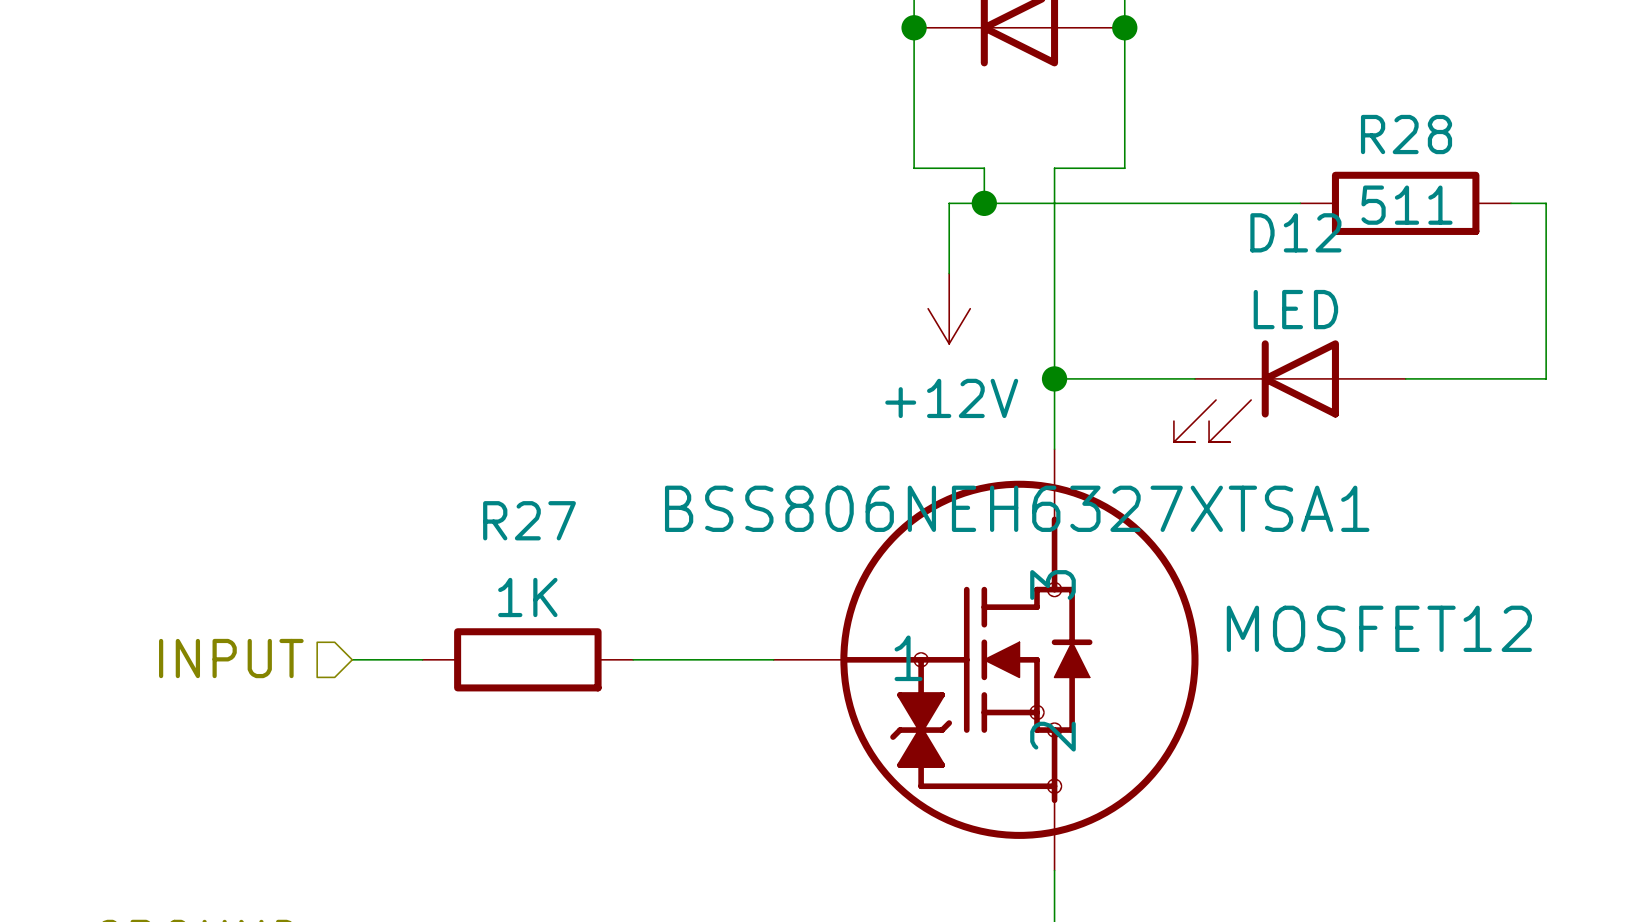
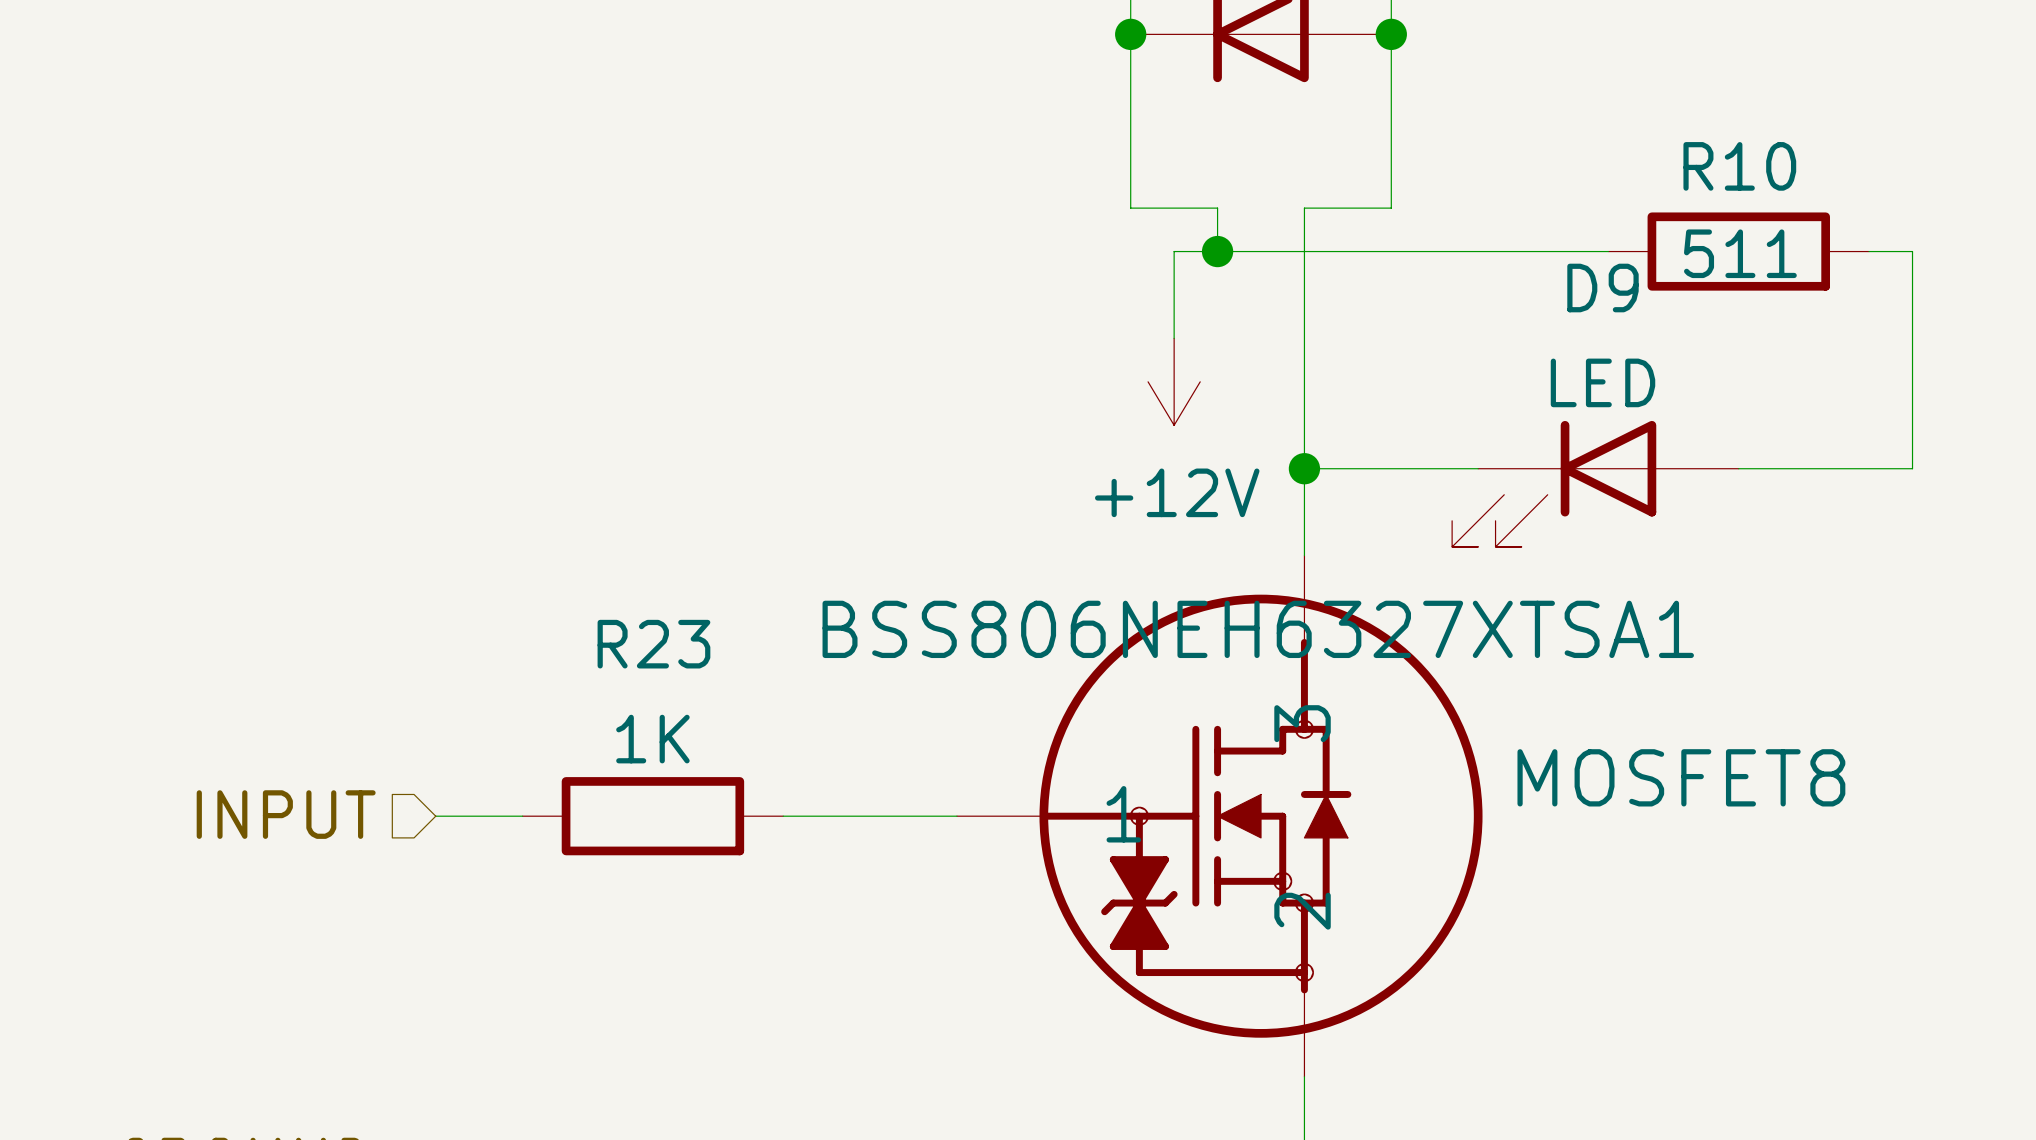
R28 name: R28 (1406, 134) -> R10 (1739, 166)
D12 name: D12 (1295, 232) -> D9 (1602, 288)
R27 name: R27 (529, 520) -> R23 (653, 644)
MOSFET12 name: MOSFET12 (1379, 628) -> MOSFET8 (1681, 777)

